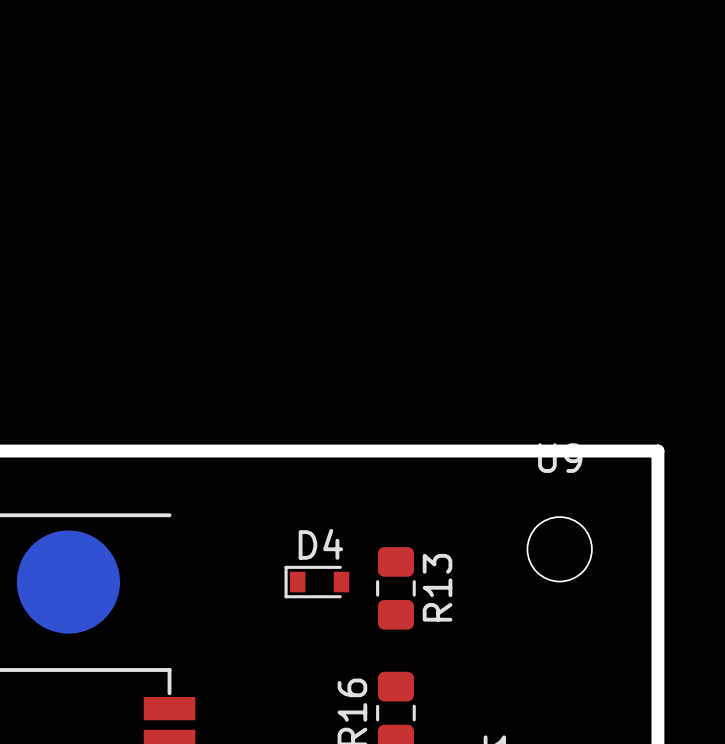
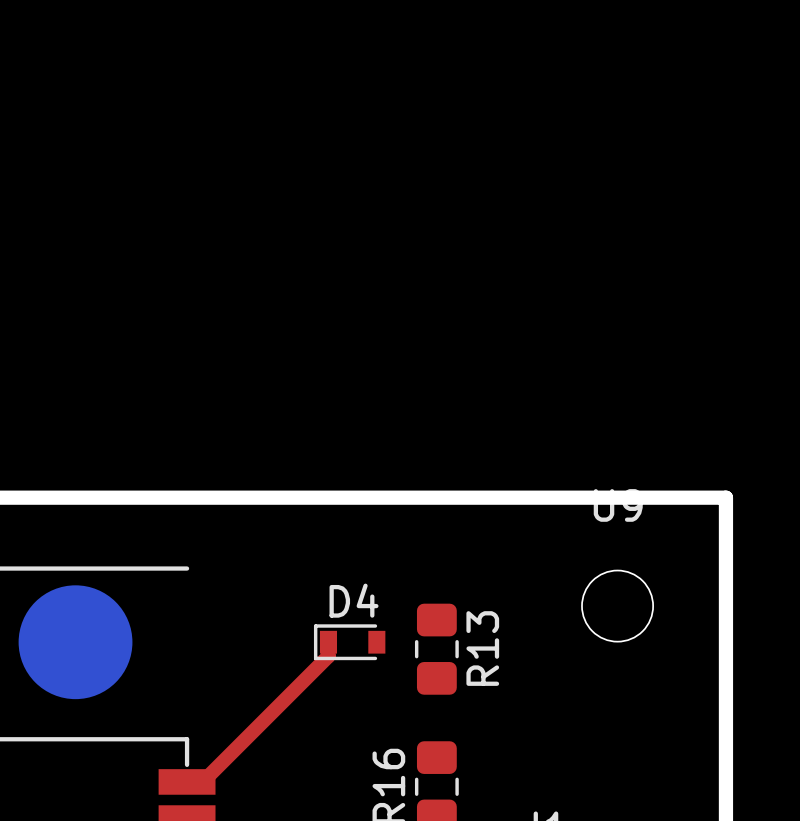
top track: none -> (328, 642) (328, 656) (202, 781) (187, 781)

